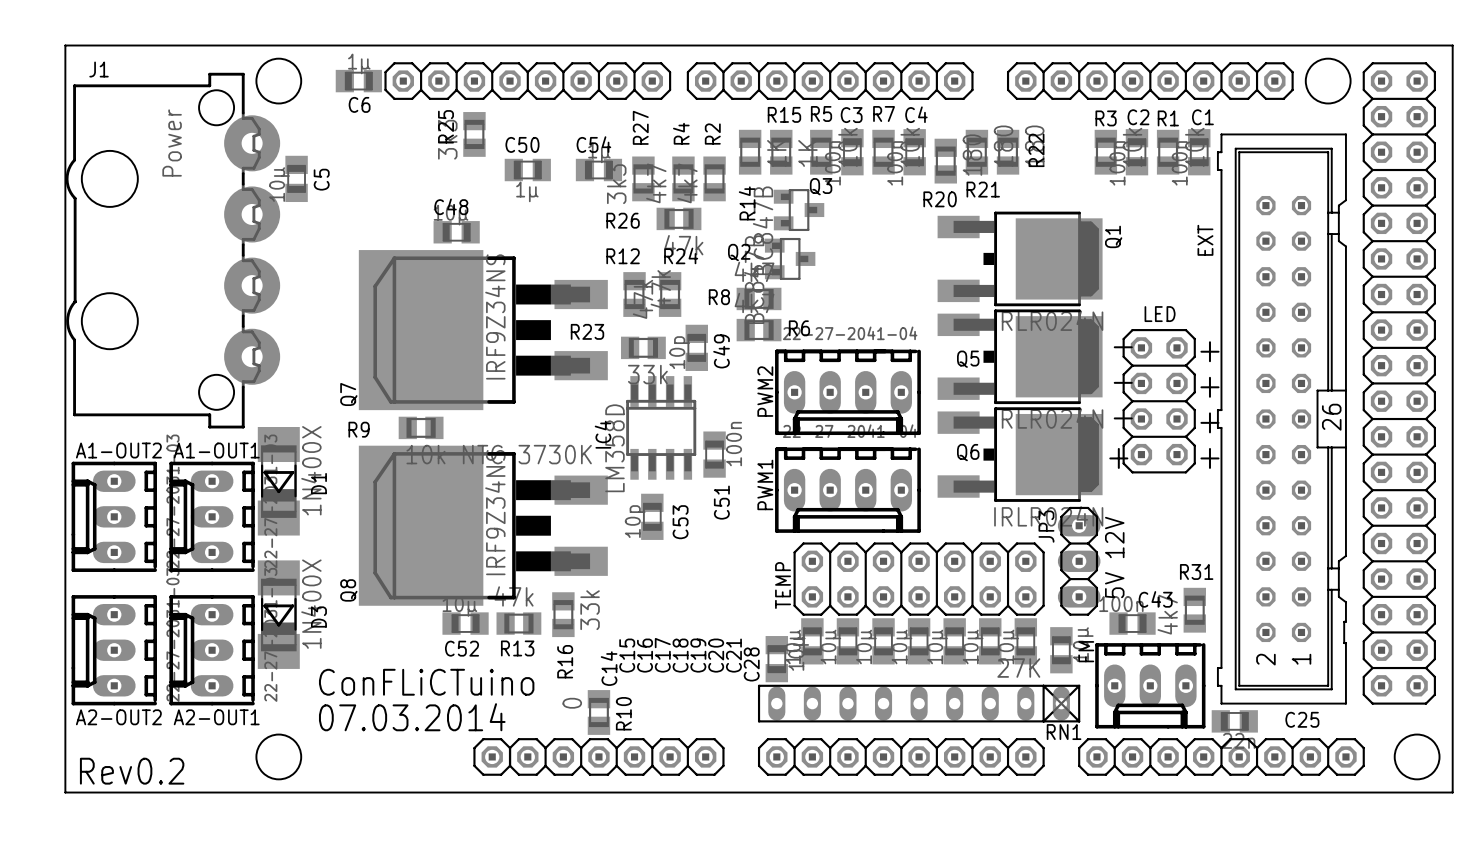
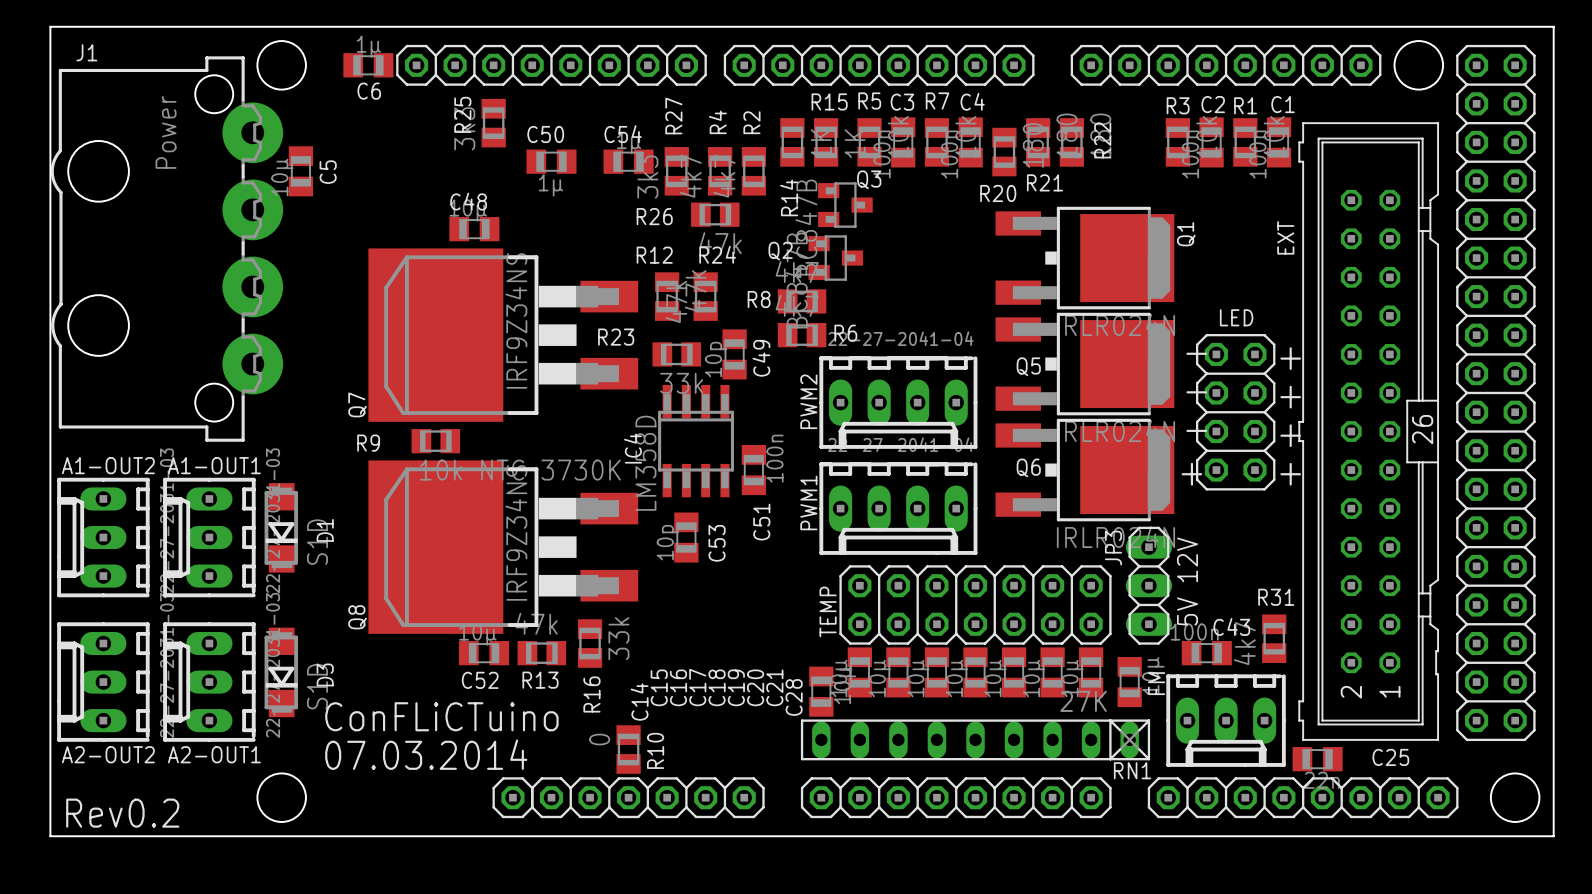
D1 footprint: [257, 427, 300, 536] -> [264, 483, 299, 573]
D1 value: 1N400X (311, 470) -> S1D (317, 542)
D3 footprint: [257, 560, 300, 669] -> [264, 627, 299, 718]
D3 value: 1N400X (311, 604) -> S1D (317, 686)

